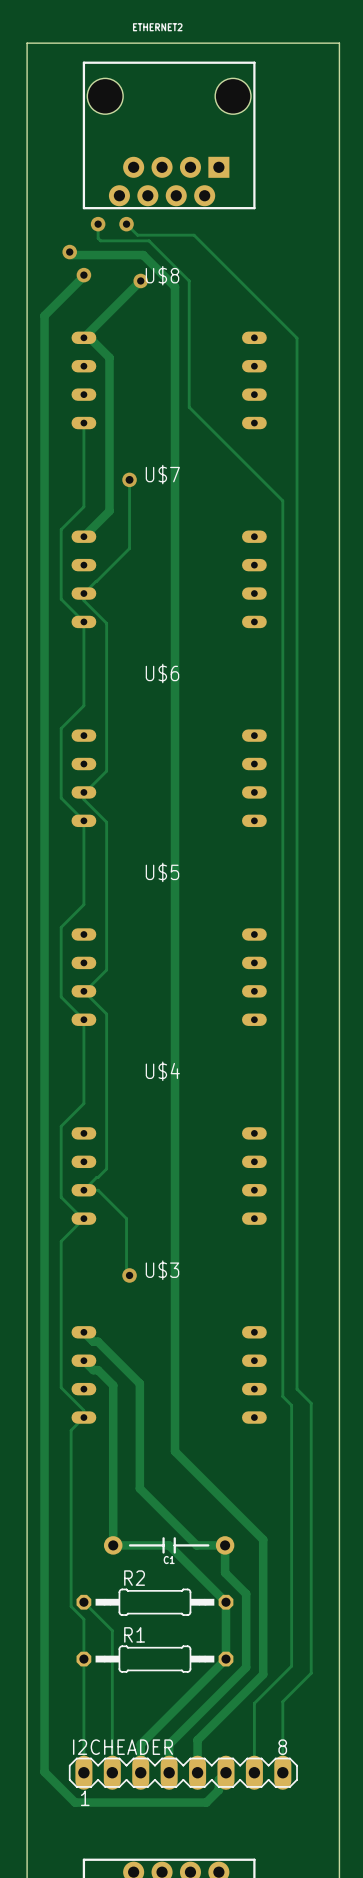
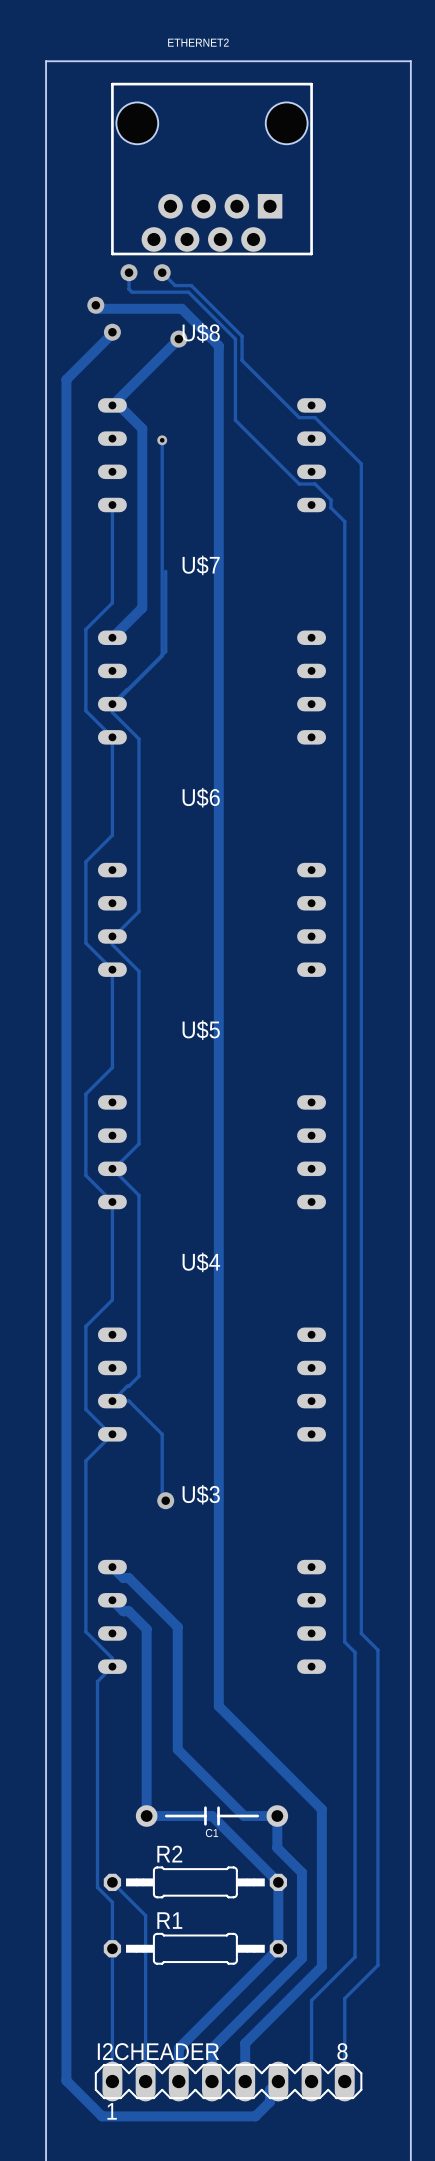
track: (151, 235) (194, 235) (297, 338) (297, 387) -> (191, 285) (242, 336) (242, 360) (299, 417) (315, 417) (361, 463)
track: (189, 350) (189, 407) (282, 500) -> (235, 420) (299, 484) (315, 484) (331, 499) (331, 507) (344, 521) (344, 595)
track: none -> (162, 440) (162, 656) (112, 705)
via: none -> (162, 440)
via: (129, 479) -> none

